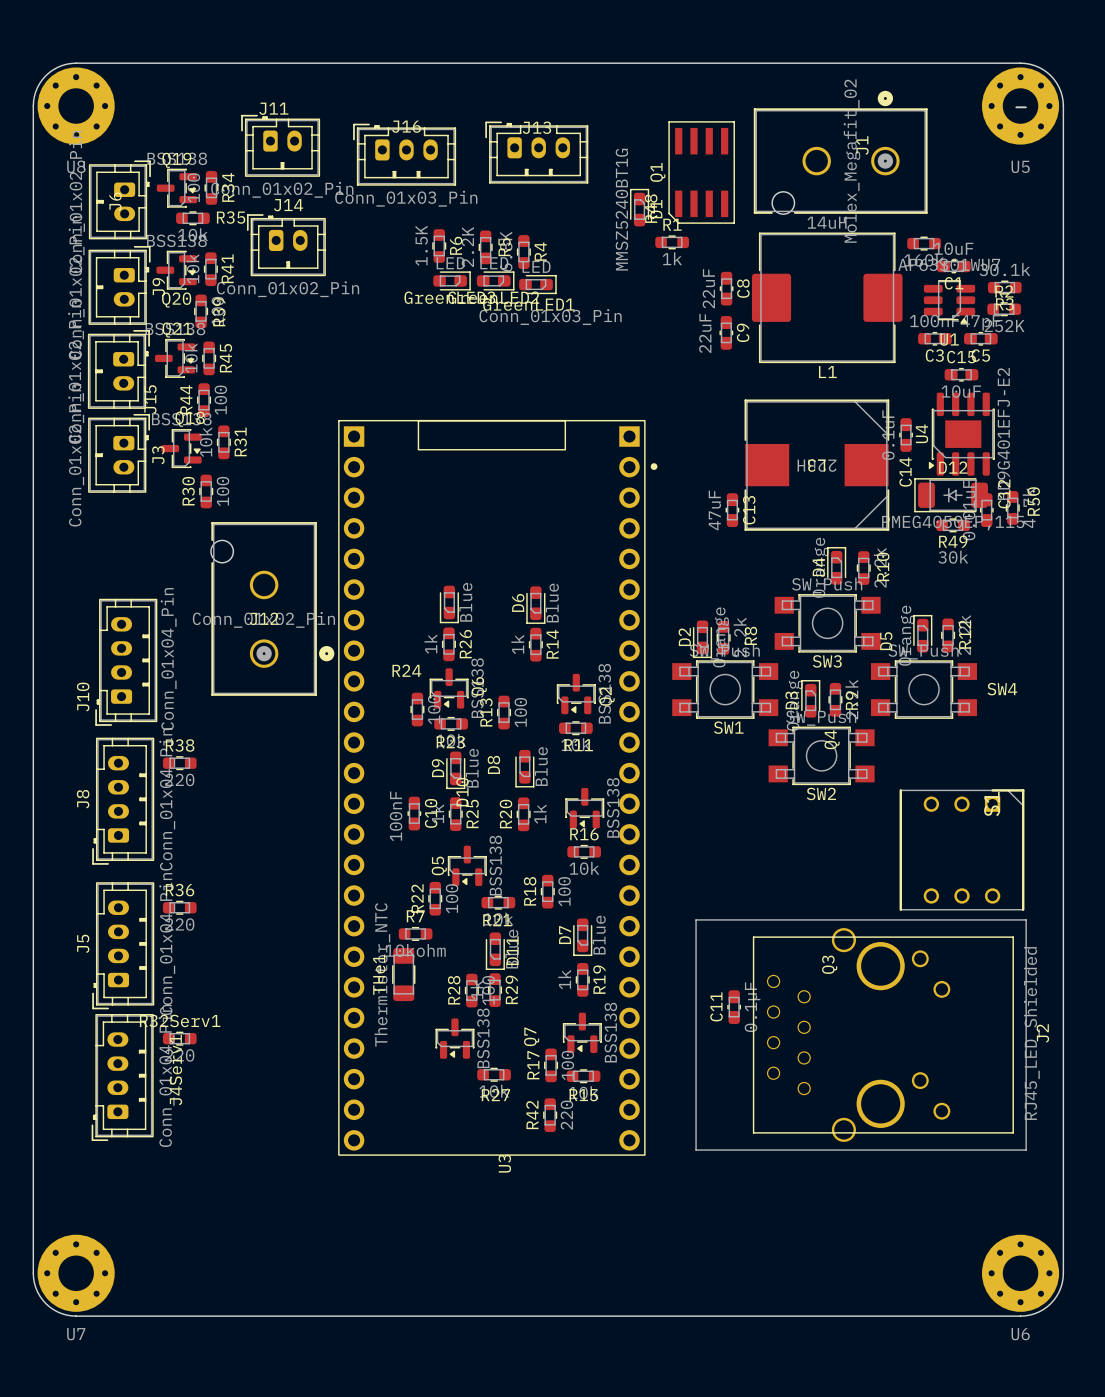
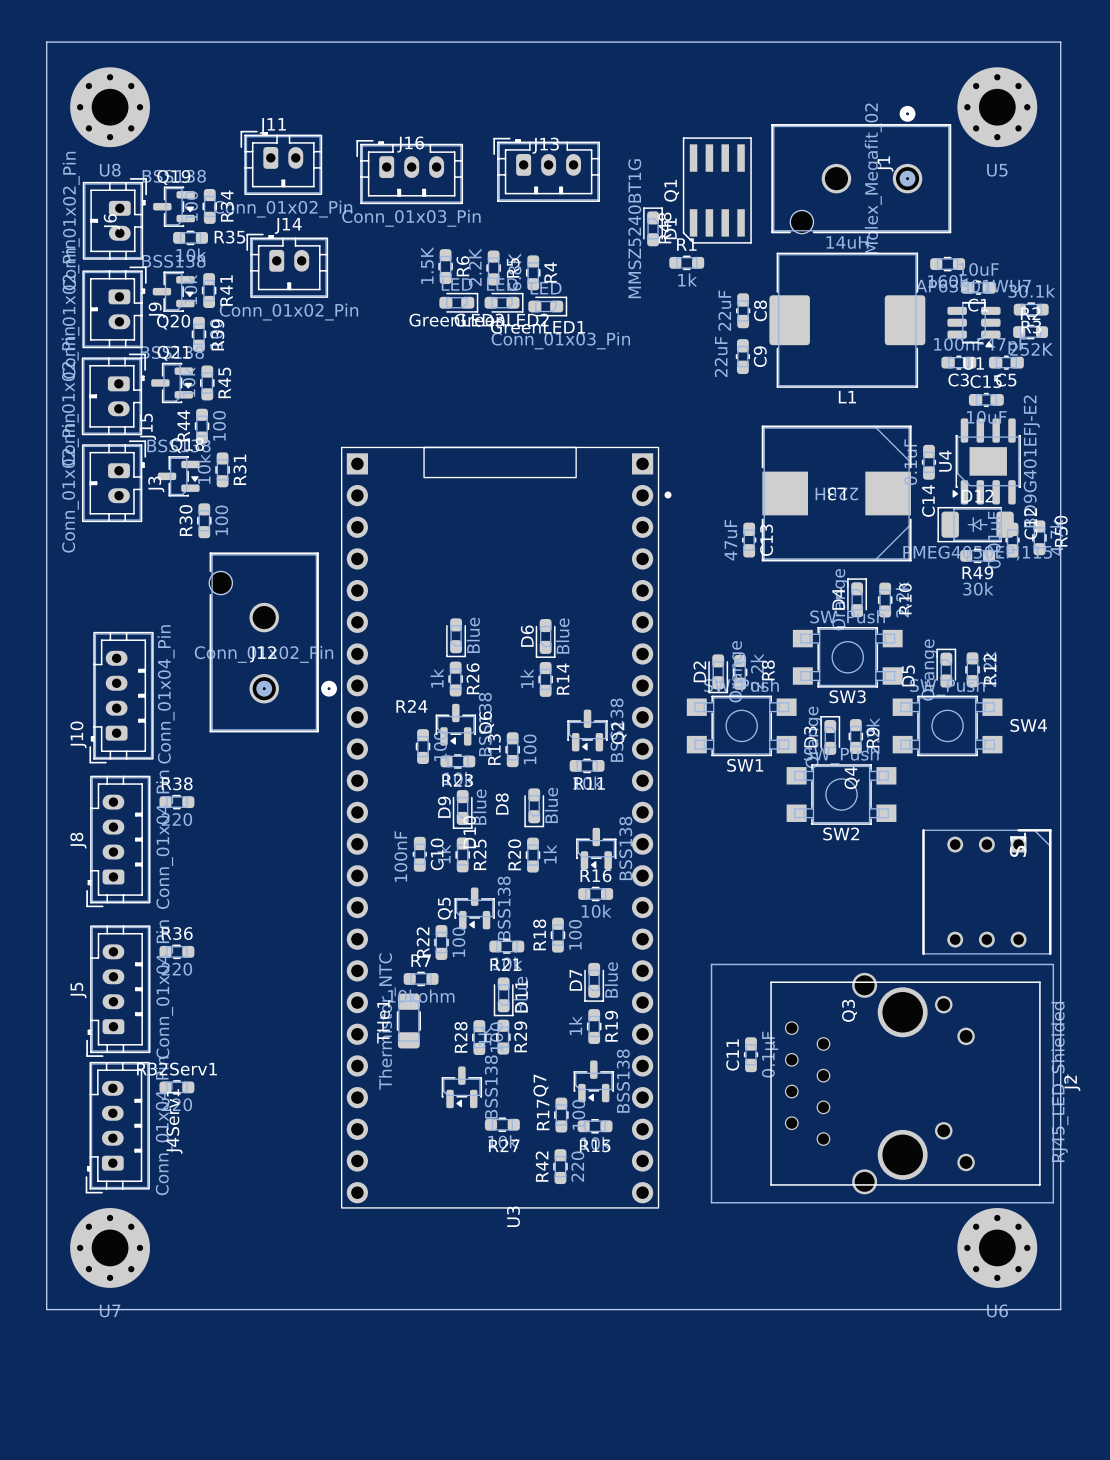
board edge: (76, 63) (1020, 63) (1039, 67) (1054, 79) (1060, 91) (1063, 106) (1063, 1273) (1059, 1291) (1047, 1306) (1034, 1313) (1020, 1316) (76, 1316) (57, 1311) (42, 1300) (35, 1287) (33, 1273) (33, 106) (35, 91) (45, 75) (57, 67) (76, 63) -> (46, 42) (46, 1309) (1060, 1309) (1060, 42) (46, 42)
U8 position: (76, 106) -> (110, 107)
U5 position: (1020, 106) -> (997, 107)
U7 position: (76, 1273) -> (110, 1247)
U6 position: (1020, 1273) -> (997, 1247)

